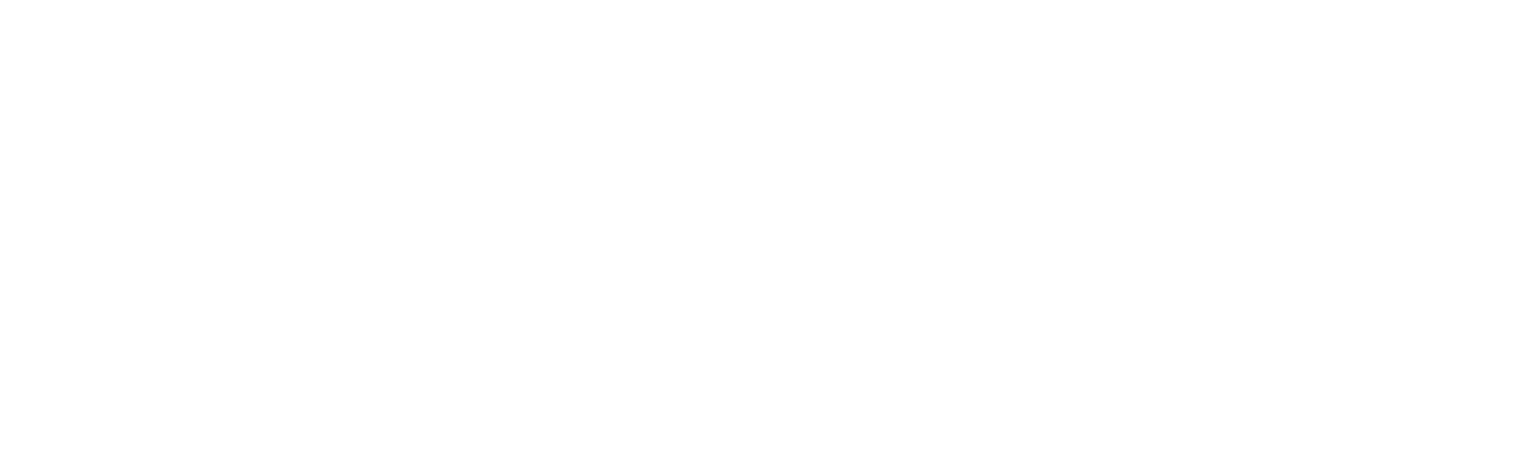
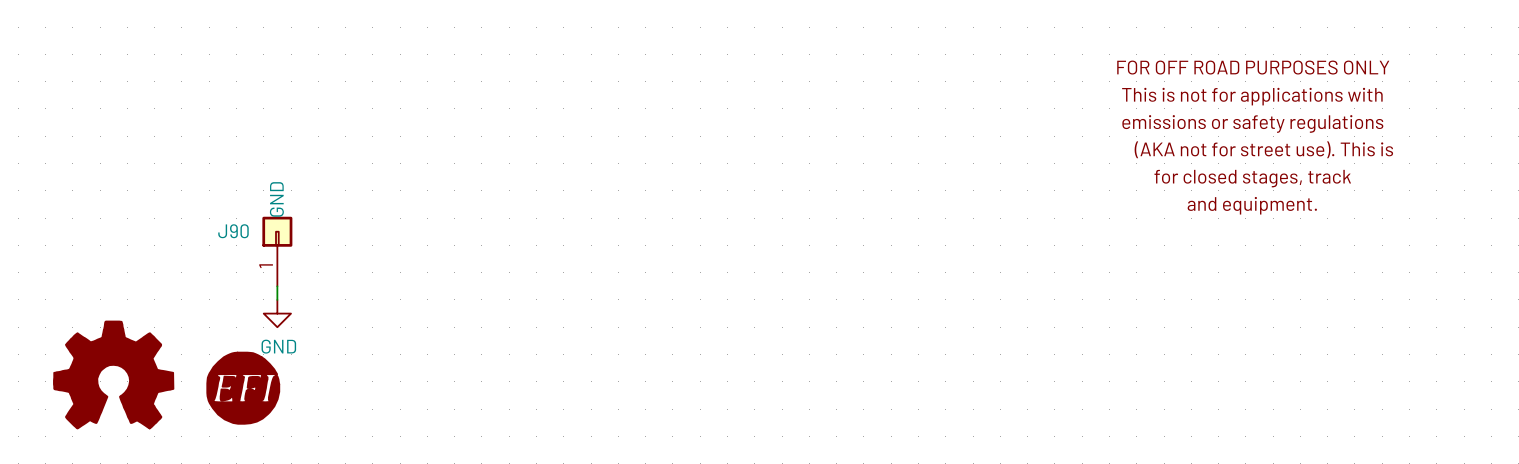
part: none -> (1255, 137)
J90: none -> GND (277, 251)
wire: none -> (277, 286) (277, 299)
power symbol: none -> GND (277, 313)
part: none -> (113, 374)
part: none -> (243, 388)

